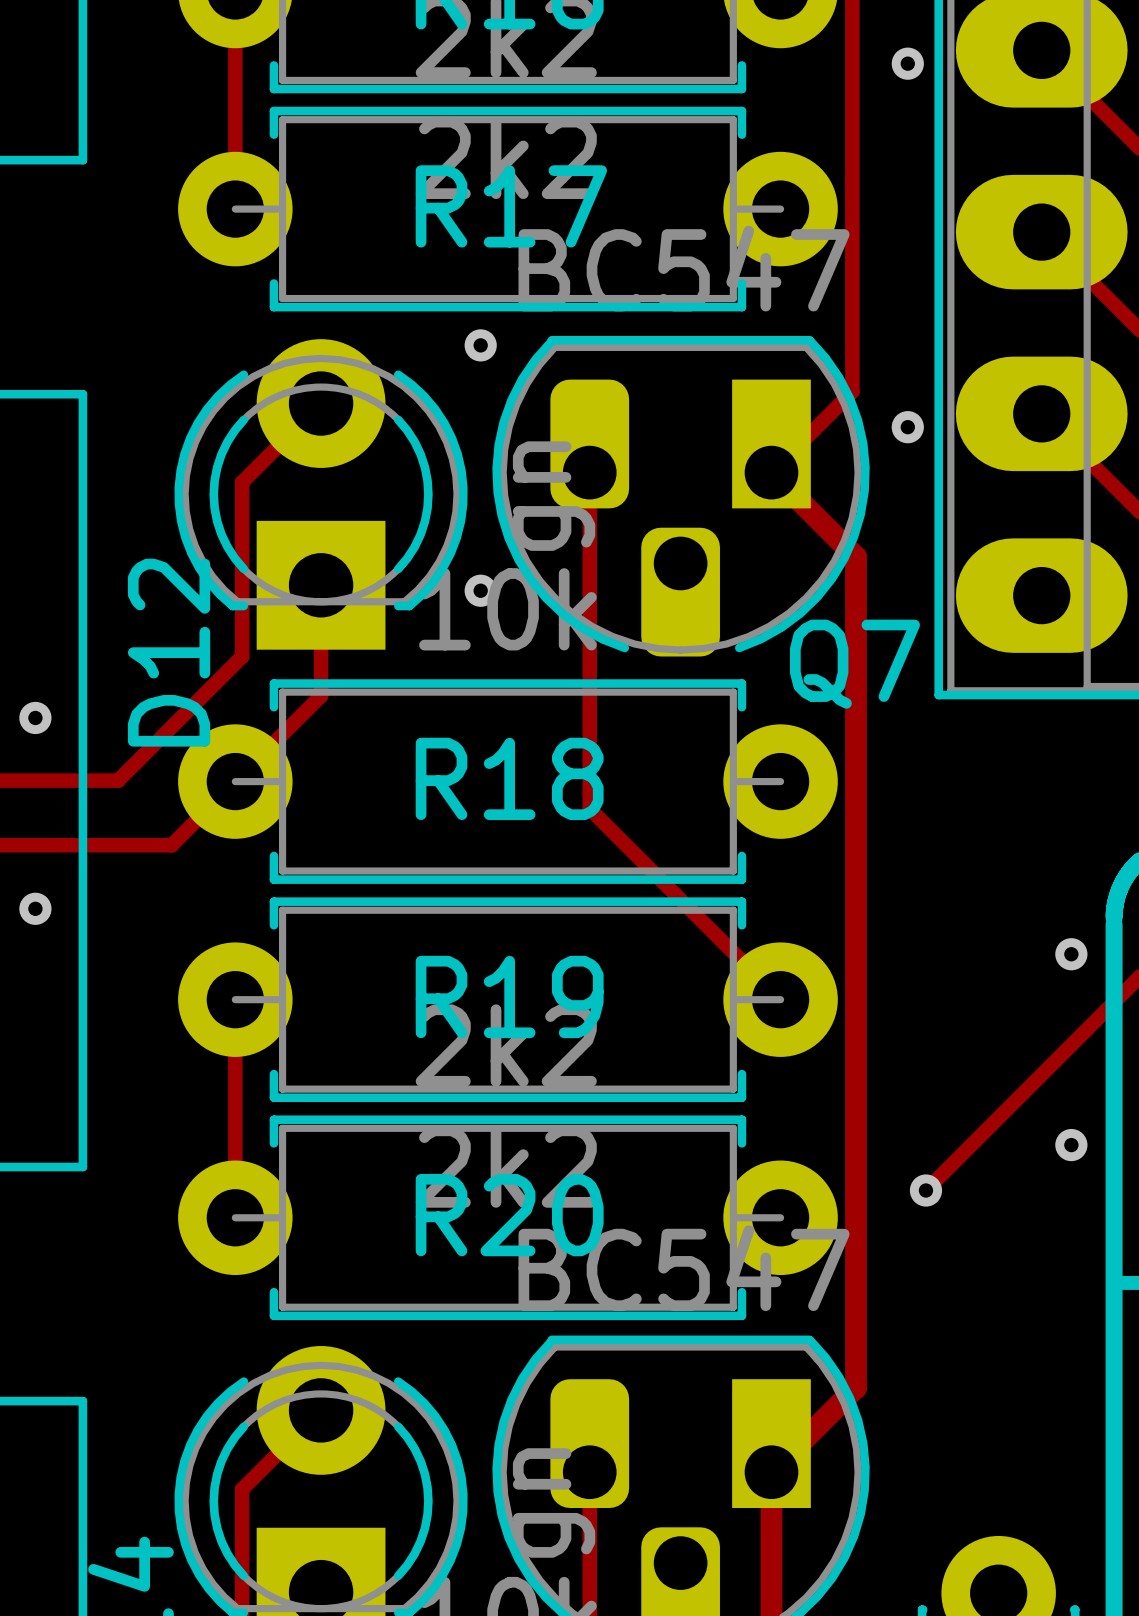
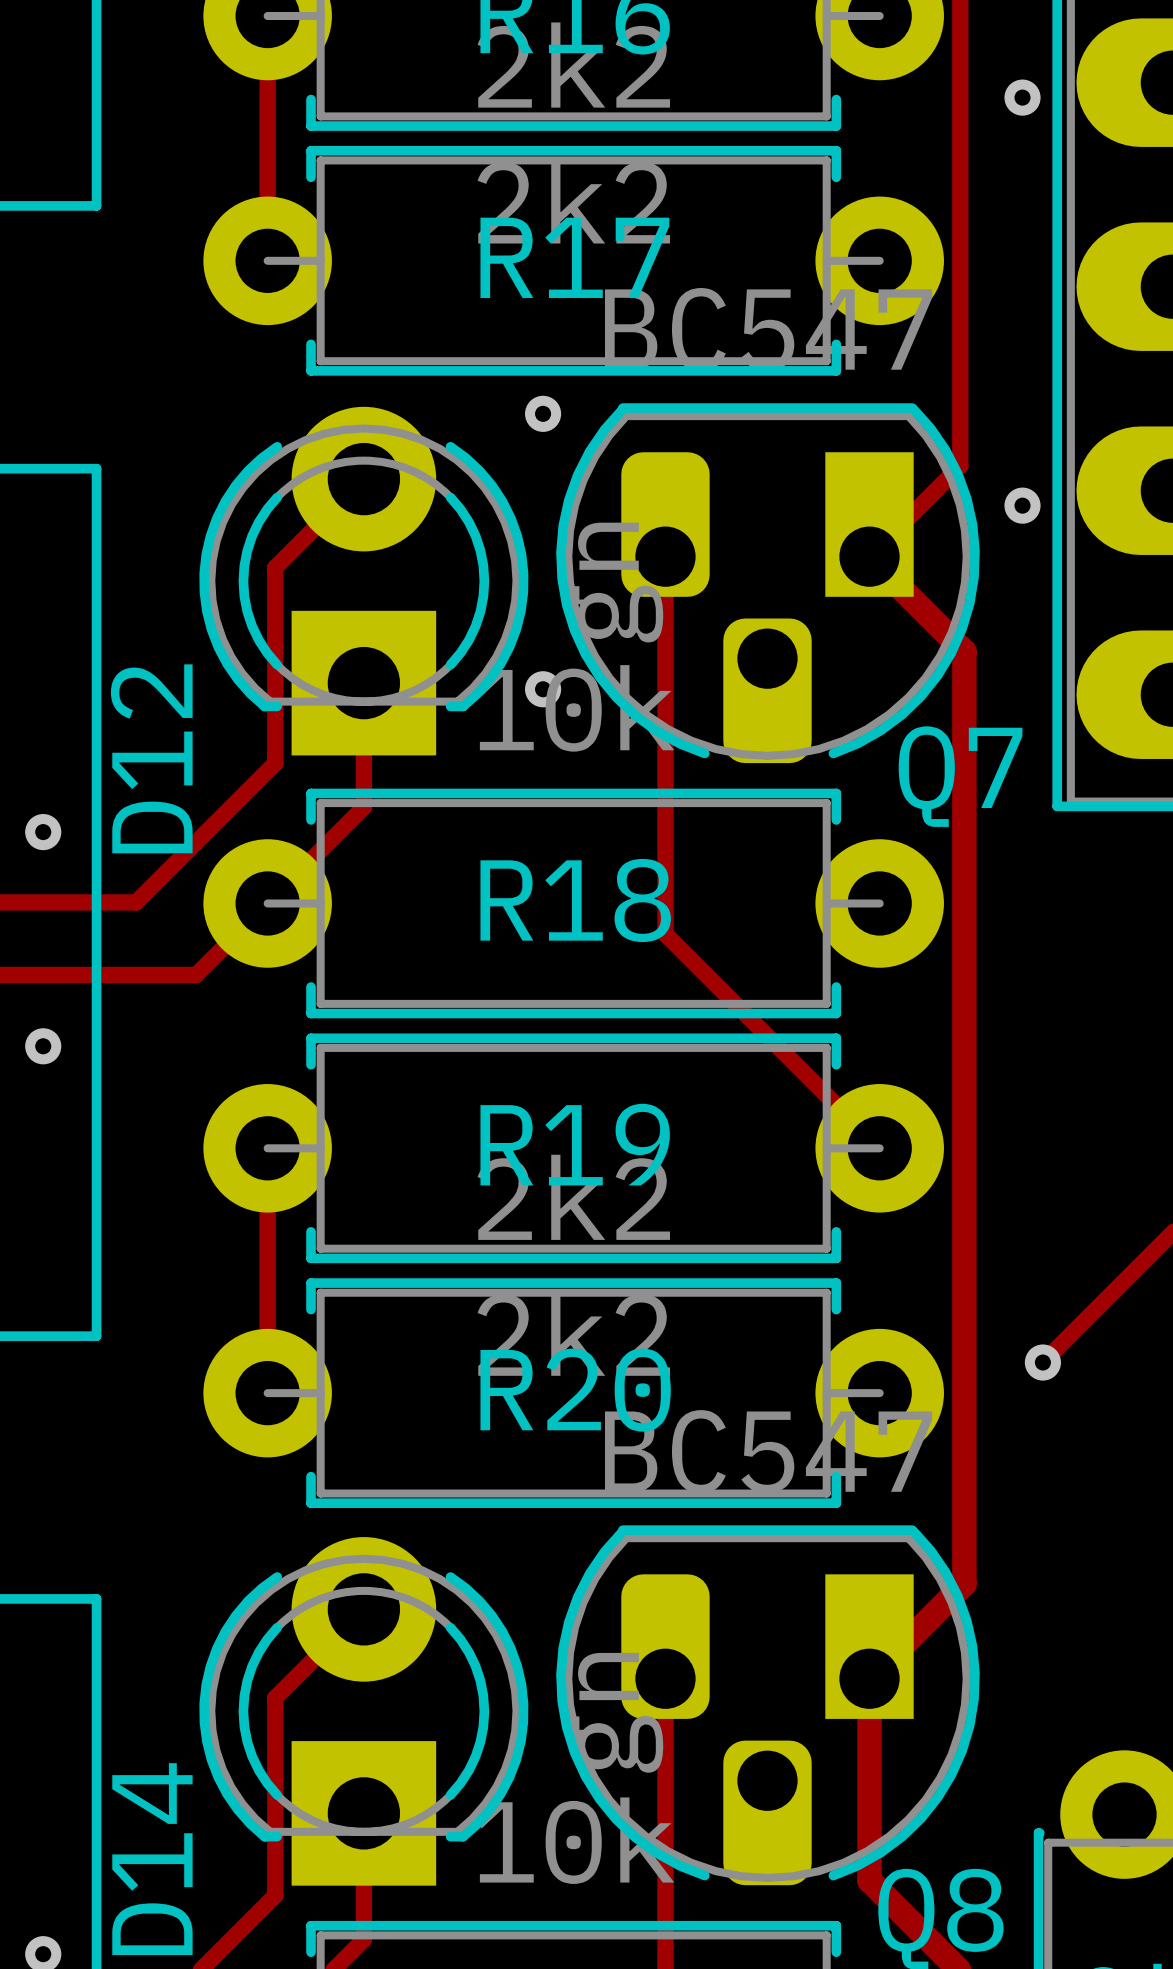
D12 name position: D12 (169, 652) -> D12 (151, 758)

